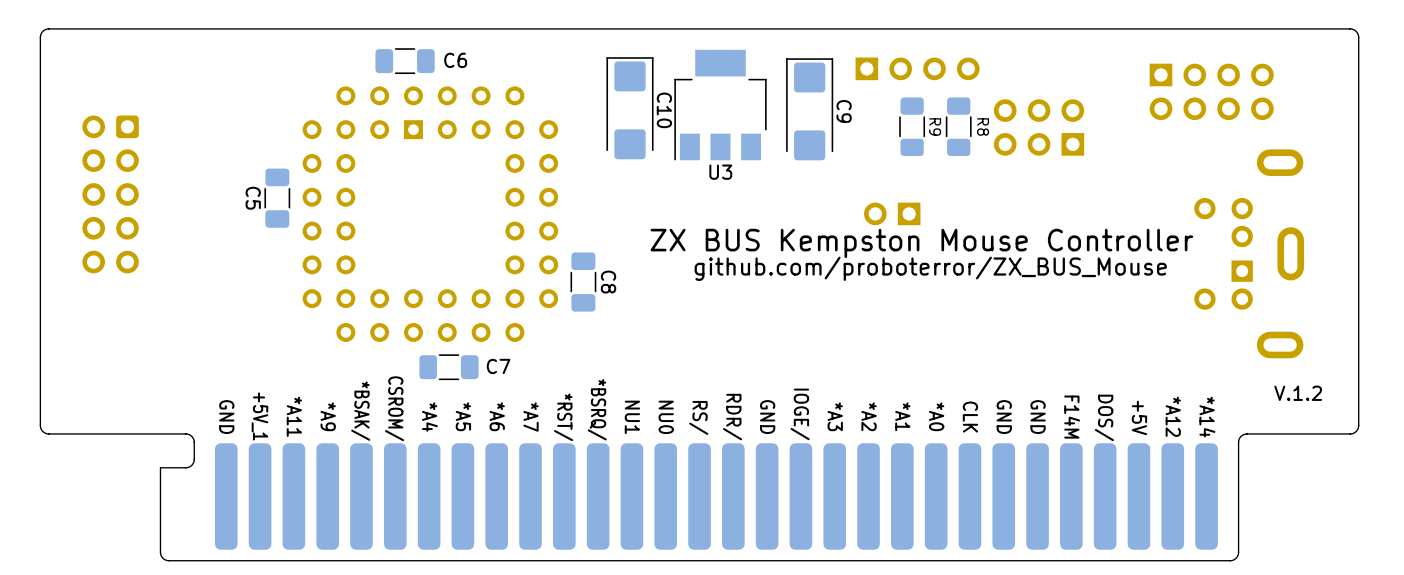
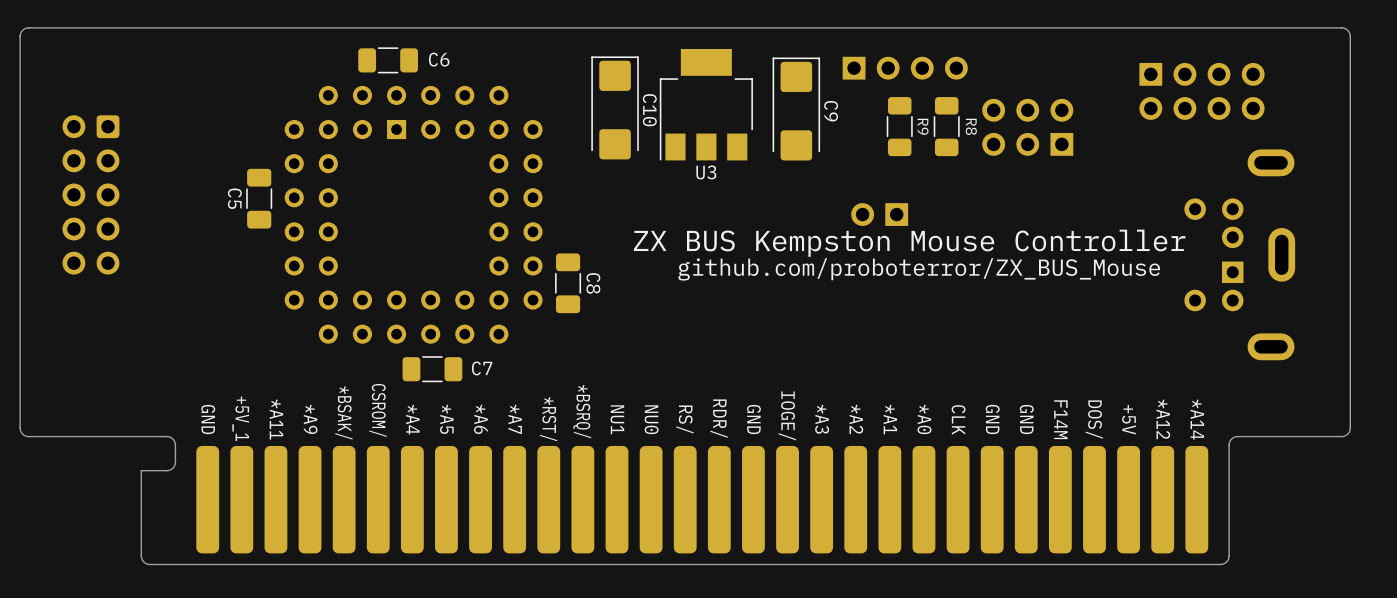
text: V.1.2 (1298, 393) -> none

